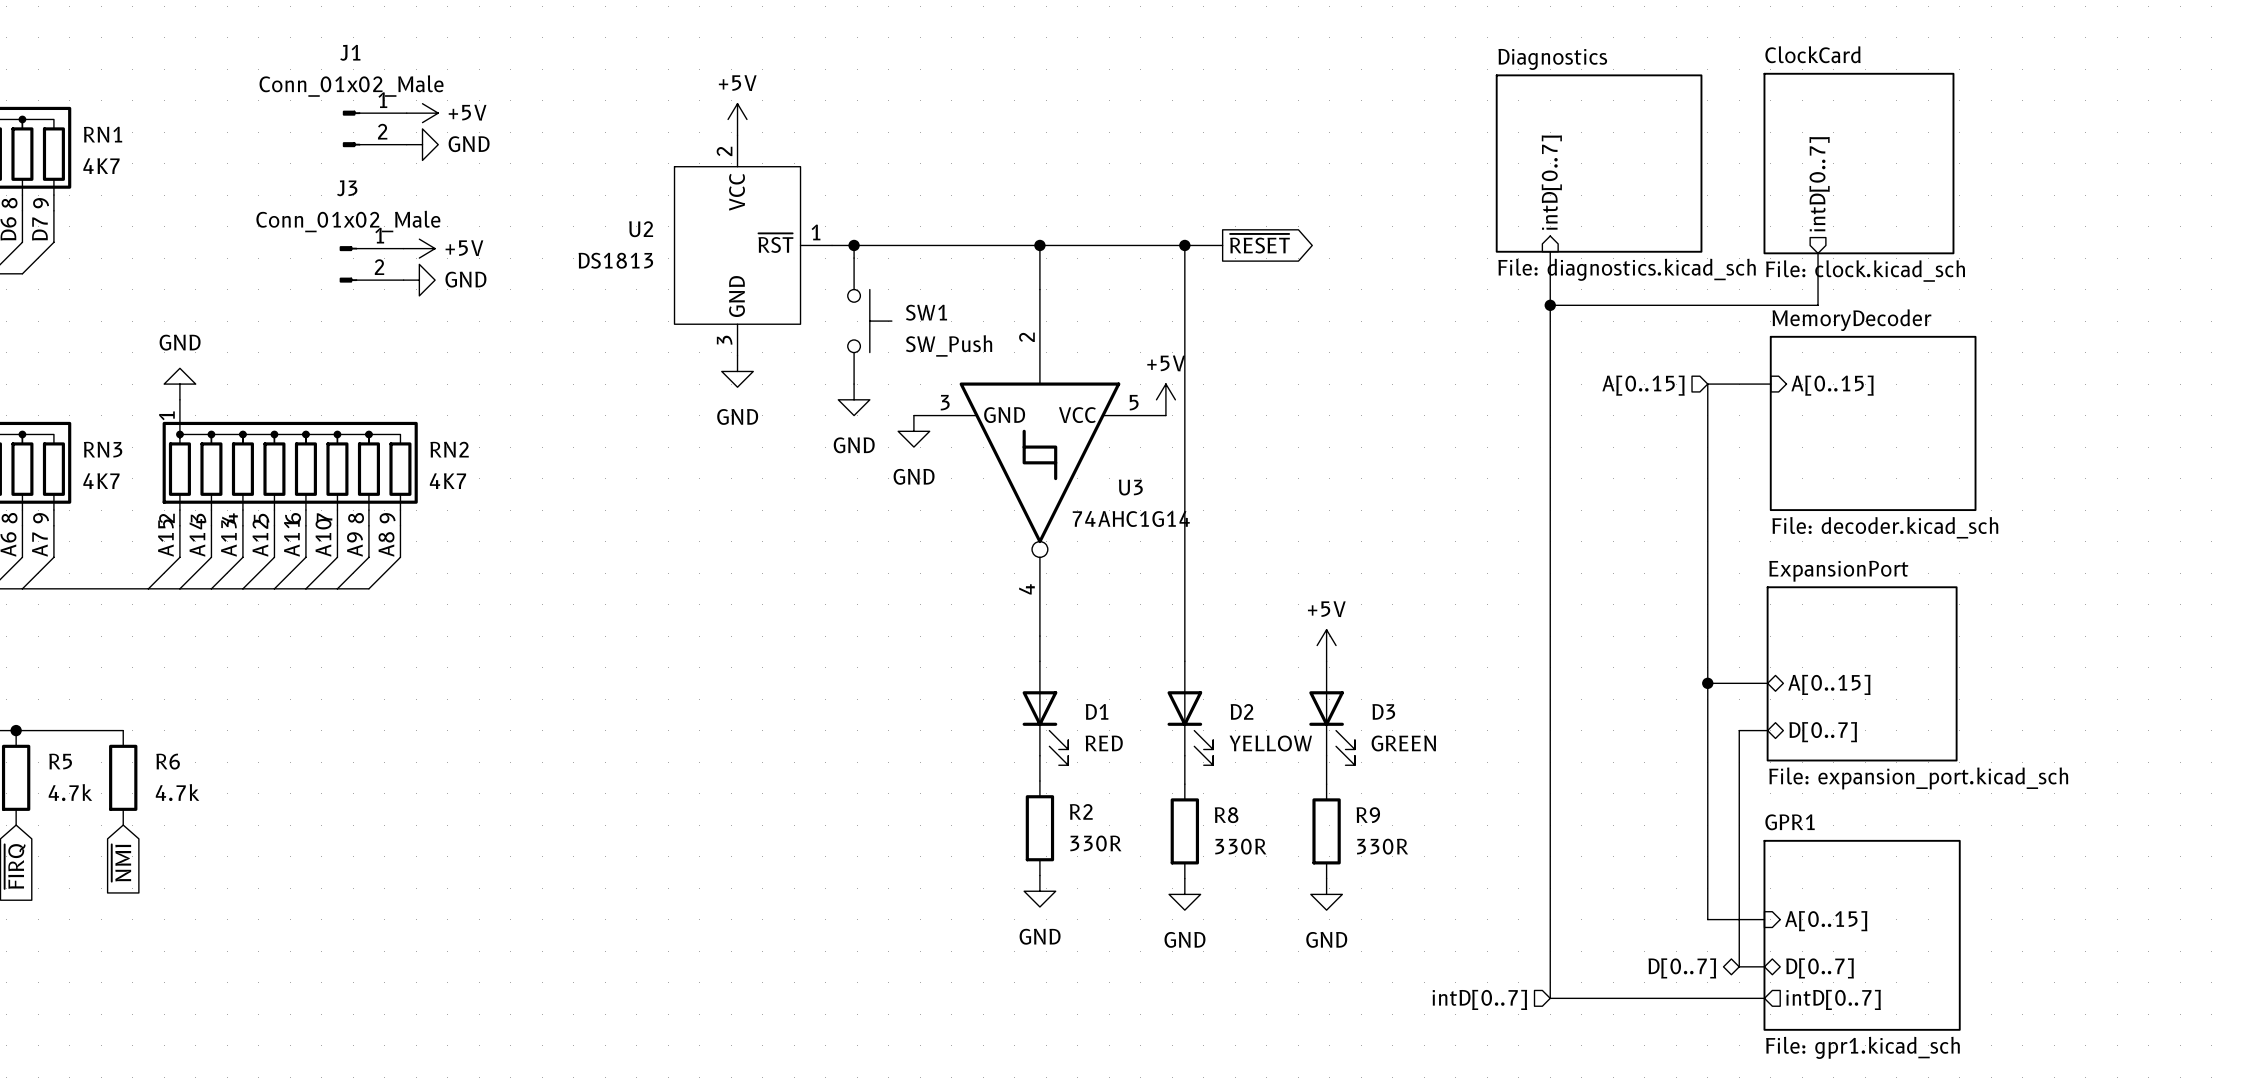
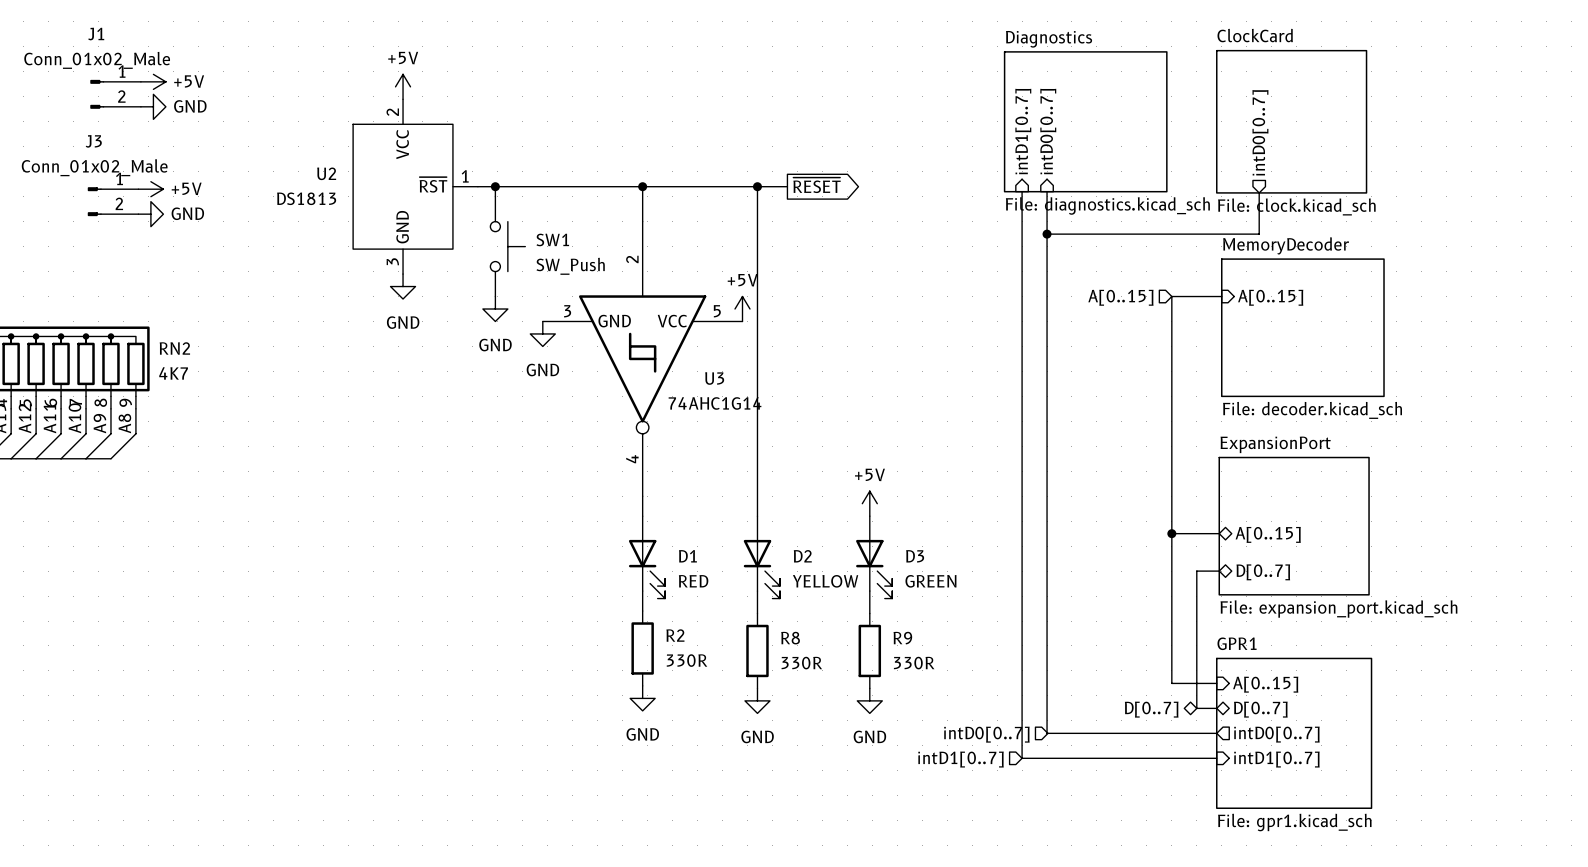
sheet pin: none -> intD1[0..7] (1023, 131)
sheet pin: intD[0..7] (1551, 182) -> intD0[0..7] (1048, 131)
sheet pin: intD[0..7] (1819, 184) -> intD0[0..7] (1260, 132)
bus: none -> (1022, 191) (1022, 758) (1196, 758)
bus: (1707, 872) (1707, 919) (1764, 919) -> (1171, 683) (1216, 683)
bus: (1739, 903) (1739, 966) -> (1196, 708) (1216, 708)
sheet pin: none -> D[0..7] (1260, 709)
sheet pin position: A[0..15] (1826, 921) -> A[0..15] (1265, 684)
bus: (1550, 935) (1550, 998) (1764, 998) -> (1047, 733) (1216, 733)
sheet pin: none -> intD0[0..7] (1276, 734)
hierarchical label: none -> intD0[0..7] (986, 734)
hierarchical label position: D[0..7] (1682, 968) -> D[0..7] (1151, 709)
sheet pin shape: bidirectional (1820, 968) -> input (1276, 759)
sheet pin: D[0..7] (1820, 968) -> intD1[0..7] (1276, 759)
hierarchical label: intD[0..7] (1479, 999) -> intD1[0..7] (961, 759)
sheet pin: intD[0..7] (1833, 999) -> none

